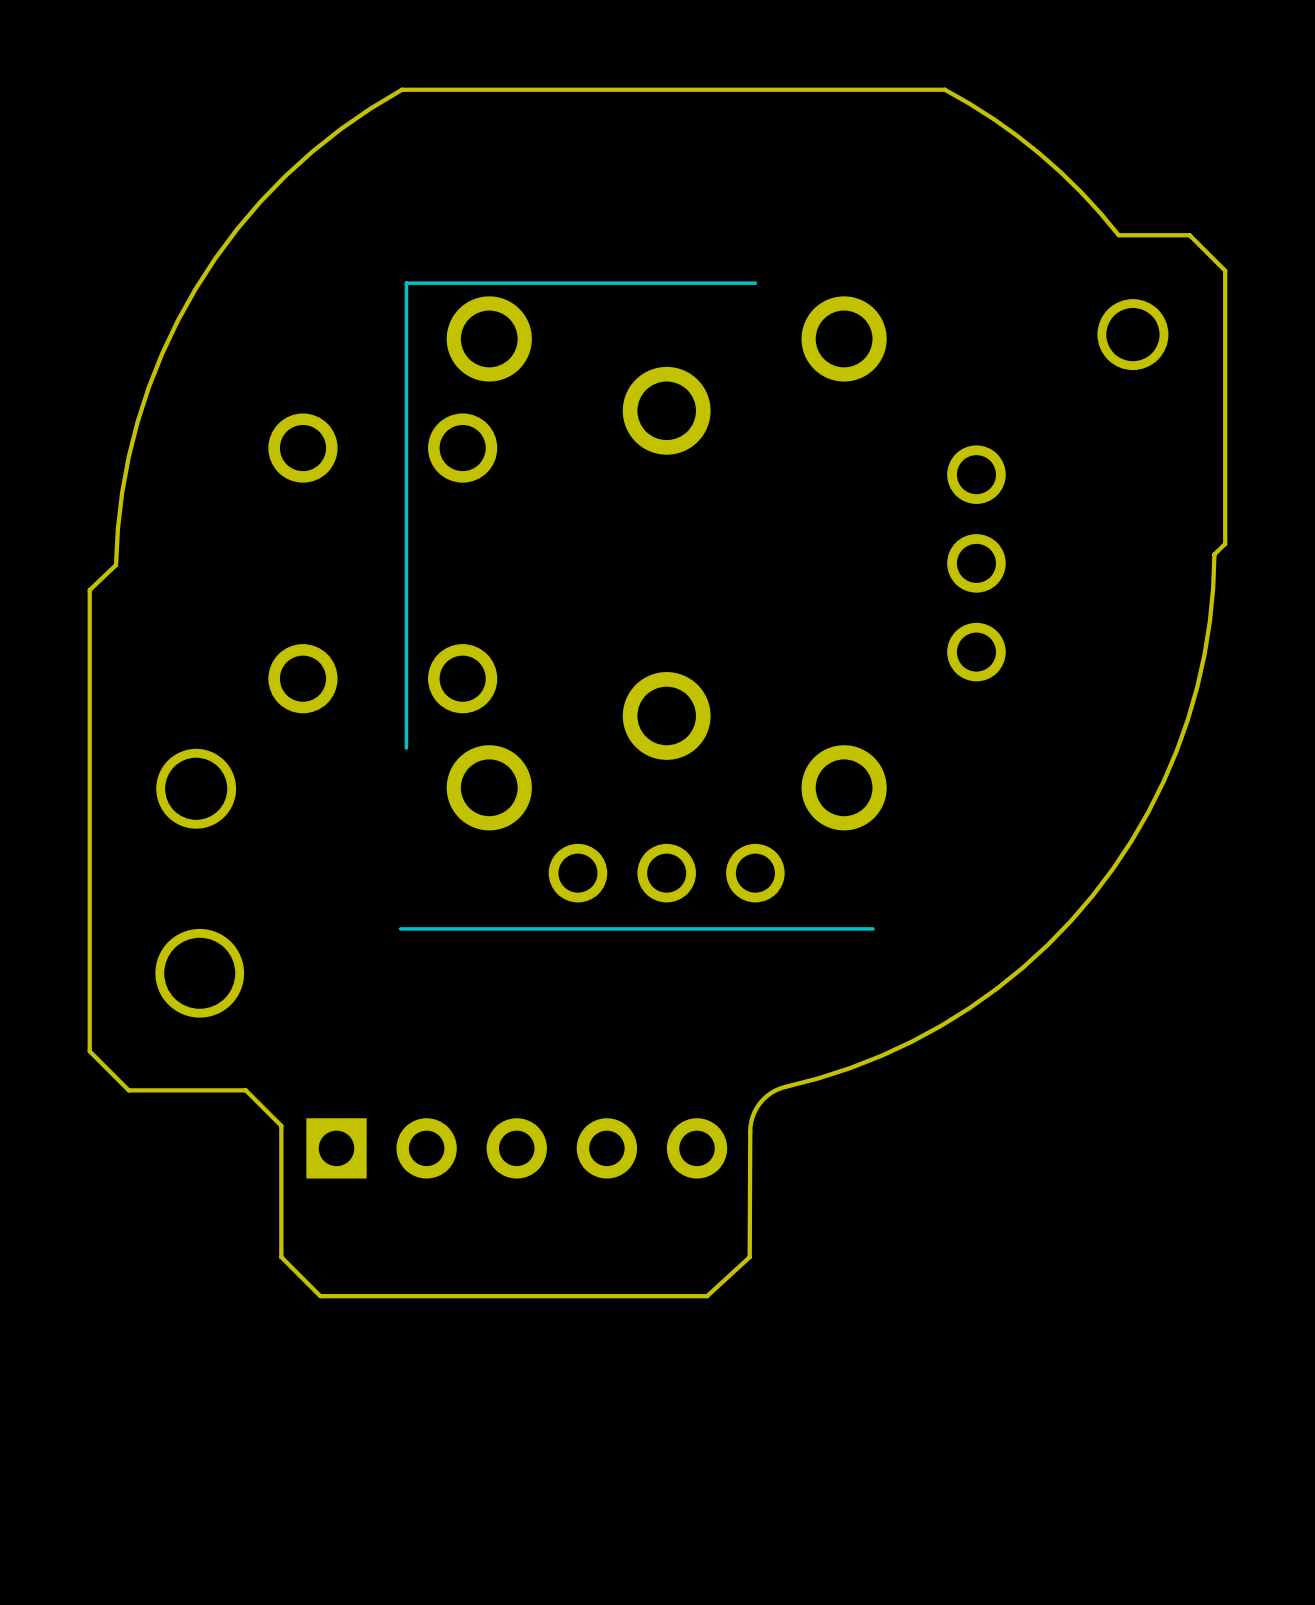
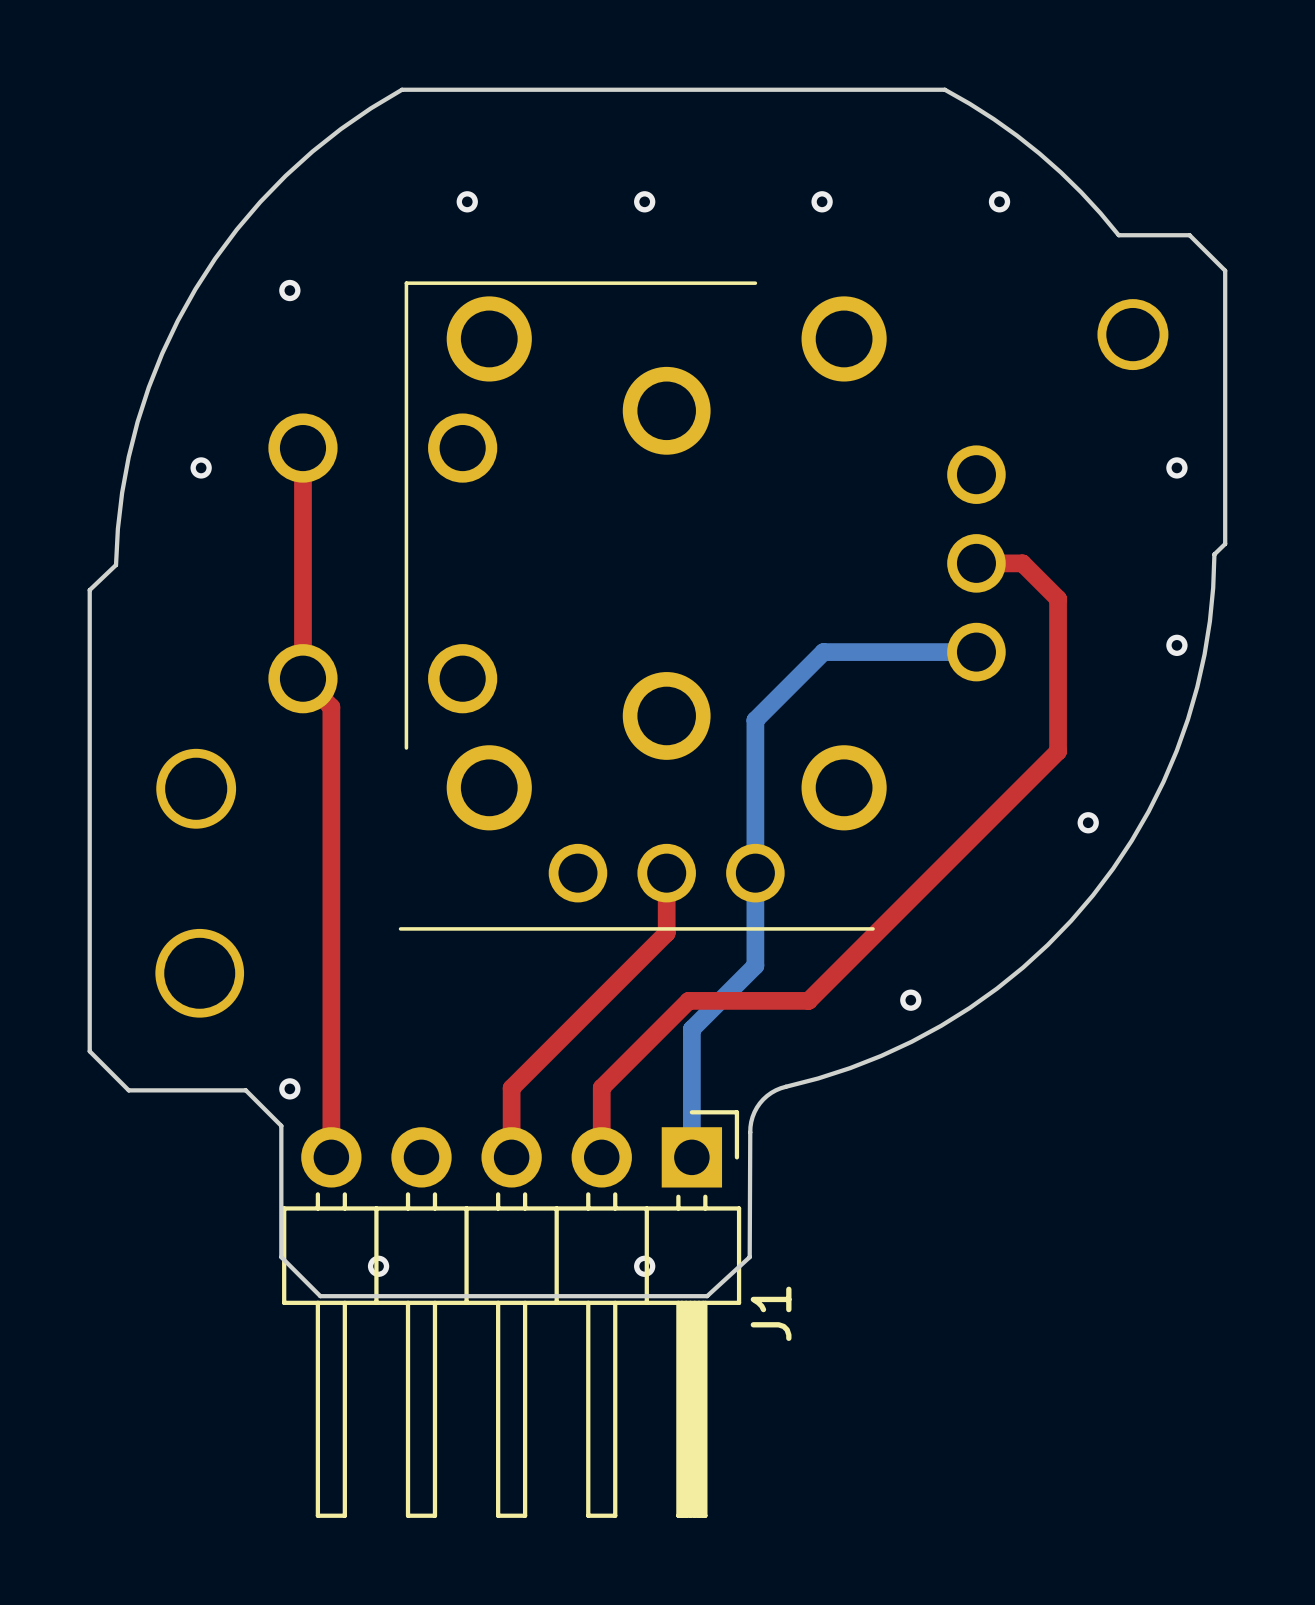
via: none -> (467, 201)
via: none -> (644, 201)
via: none -> (822, 201)
via: none -> (999, 201)
via: none -> (289, 290)
top track: none -> (302, 448) (302, 678) (331, 707) (331, 1157)
via: none -> (201, 467)
via: none -> (1176, 467)
top track: none -> (976, 563) (1022, 563) (1058, 598) (1058, 751) (808, 1000) (688, 1000) (601, 1087) (601, 1157)
via: none -> (1176, 645)
bottom track: none -> (976, 652) (823, 652) (755, 720) (755, 965) (691, 1029) (691, 1157)
via: none -> (1088, 822)
top track: none -> (666, 873) (666, 933) (511, 1088) (511, 1157)
via: none -> (910, 1000)
via: none -> (289, 1088)
J1 side: bottom (516, 1148) -> top (511, 1314)
via: none -> (378, 1266)
via: none -> (644, 1266)

